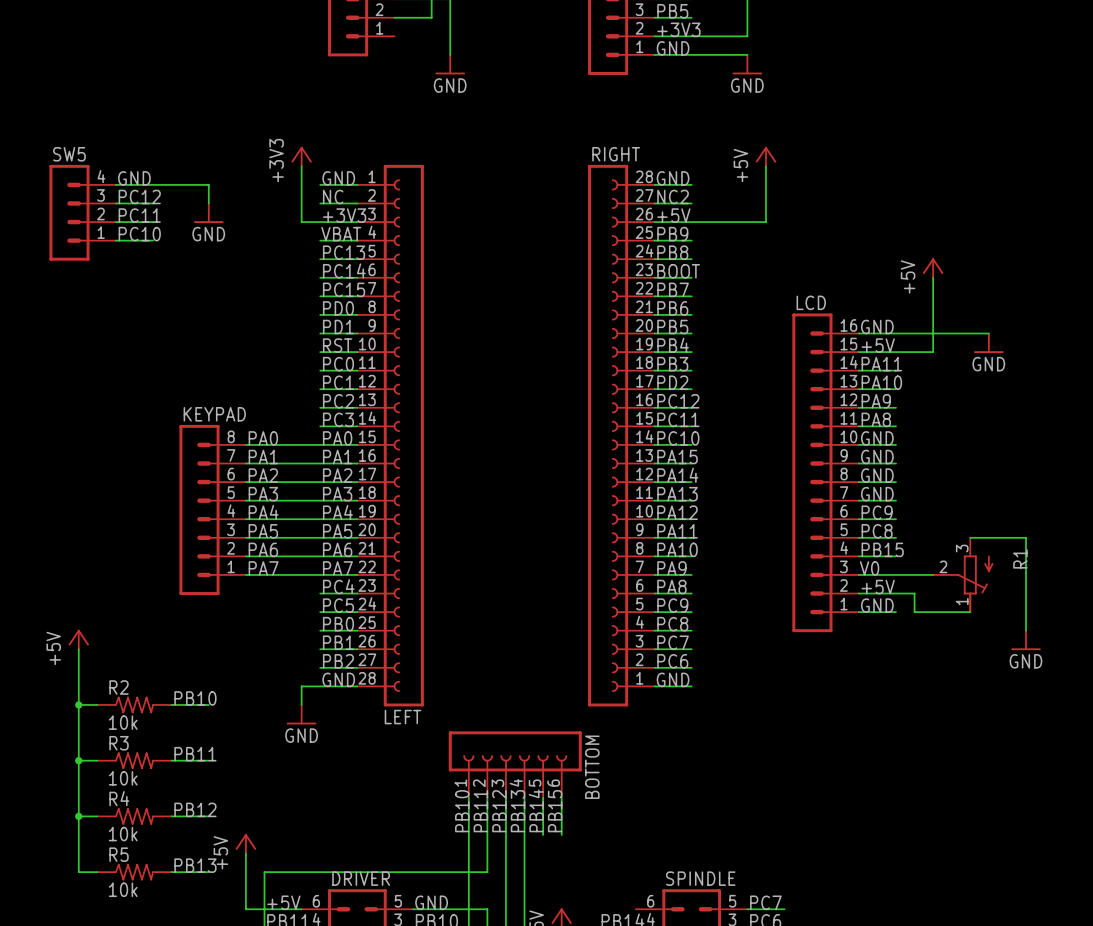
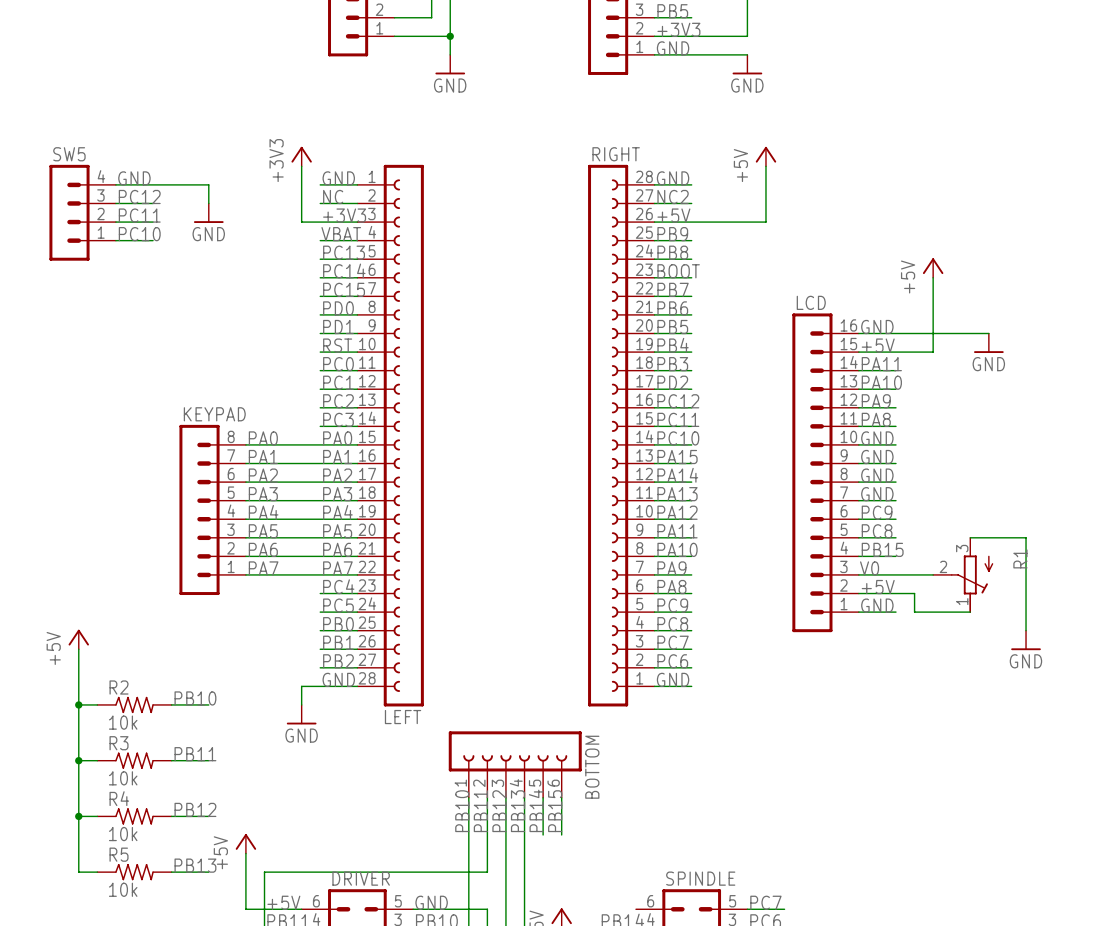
wire: none -> (394, 36) (450, 36)
junction: none -> (450, 36)

